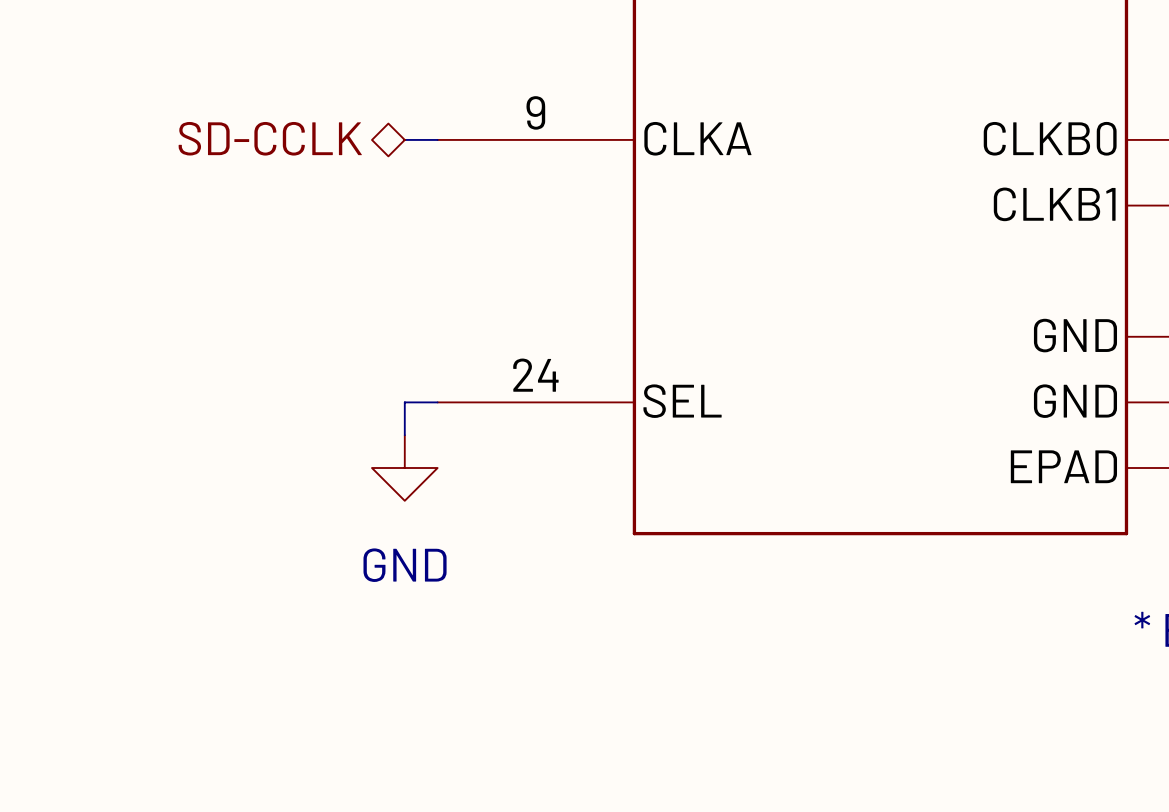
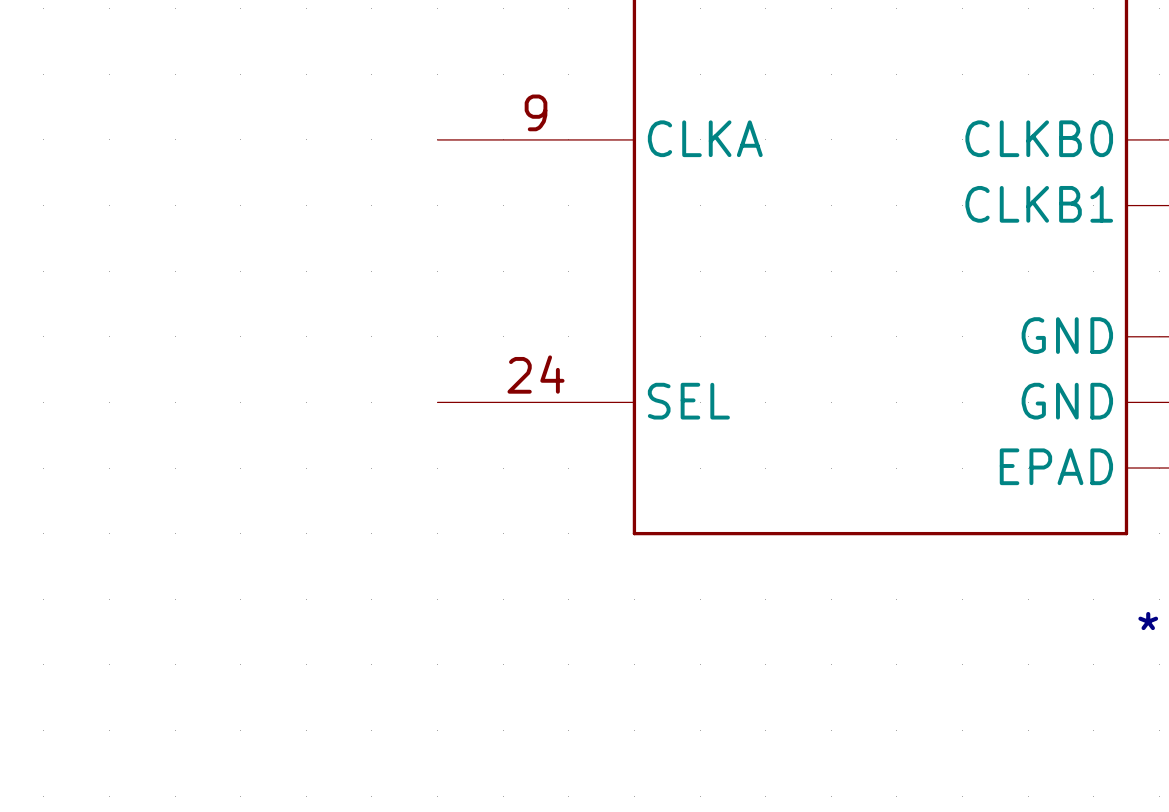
hierarchical label: SD-CCLK (270, 138) -> none
wire: (404, 139) (437, 139) -> none
wire: (437, 402) (404, 402) (404, 435) -> none
power symbol: GND (404, 468) -> none

